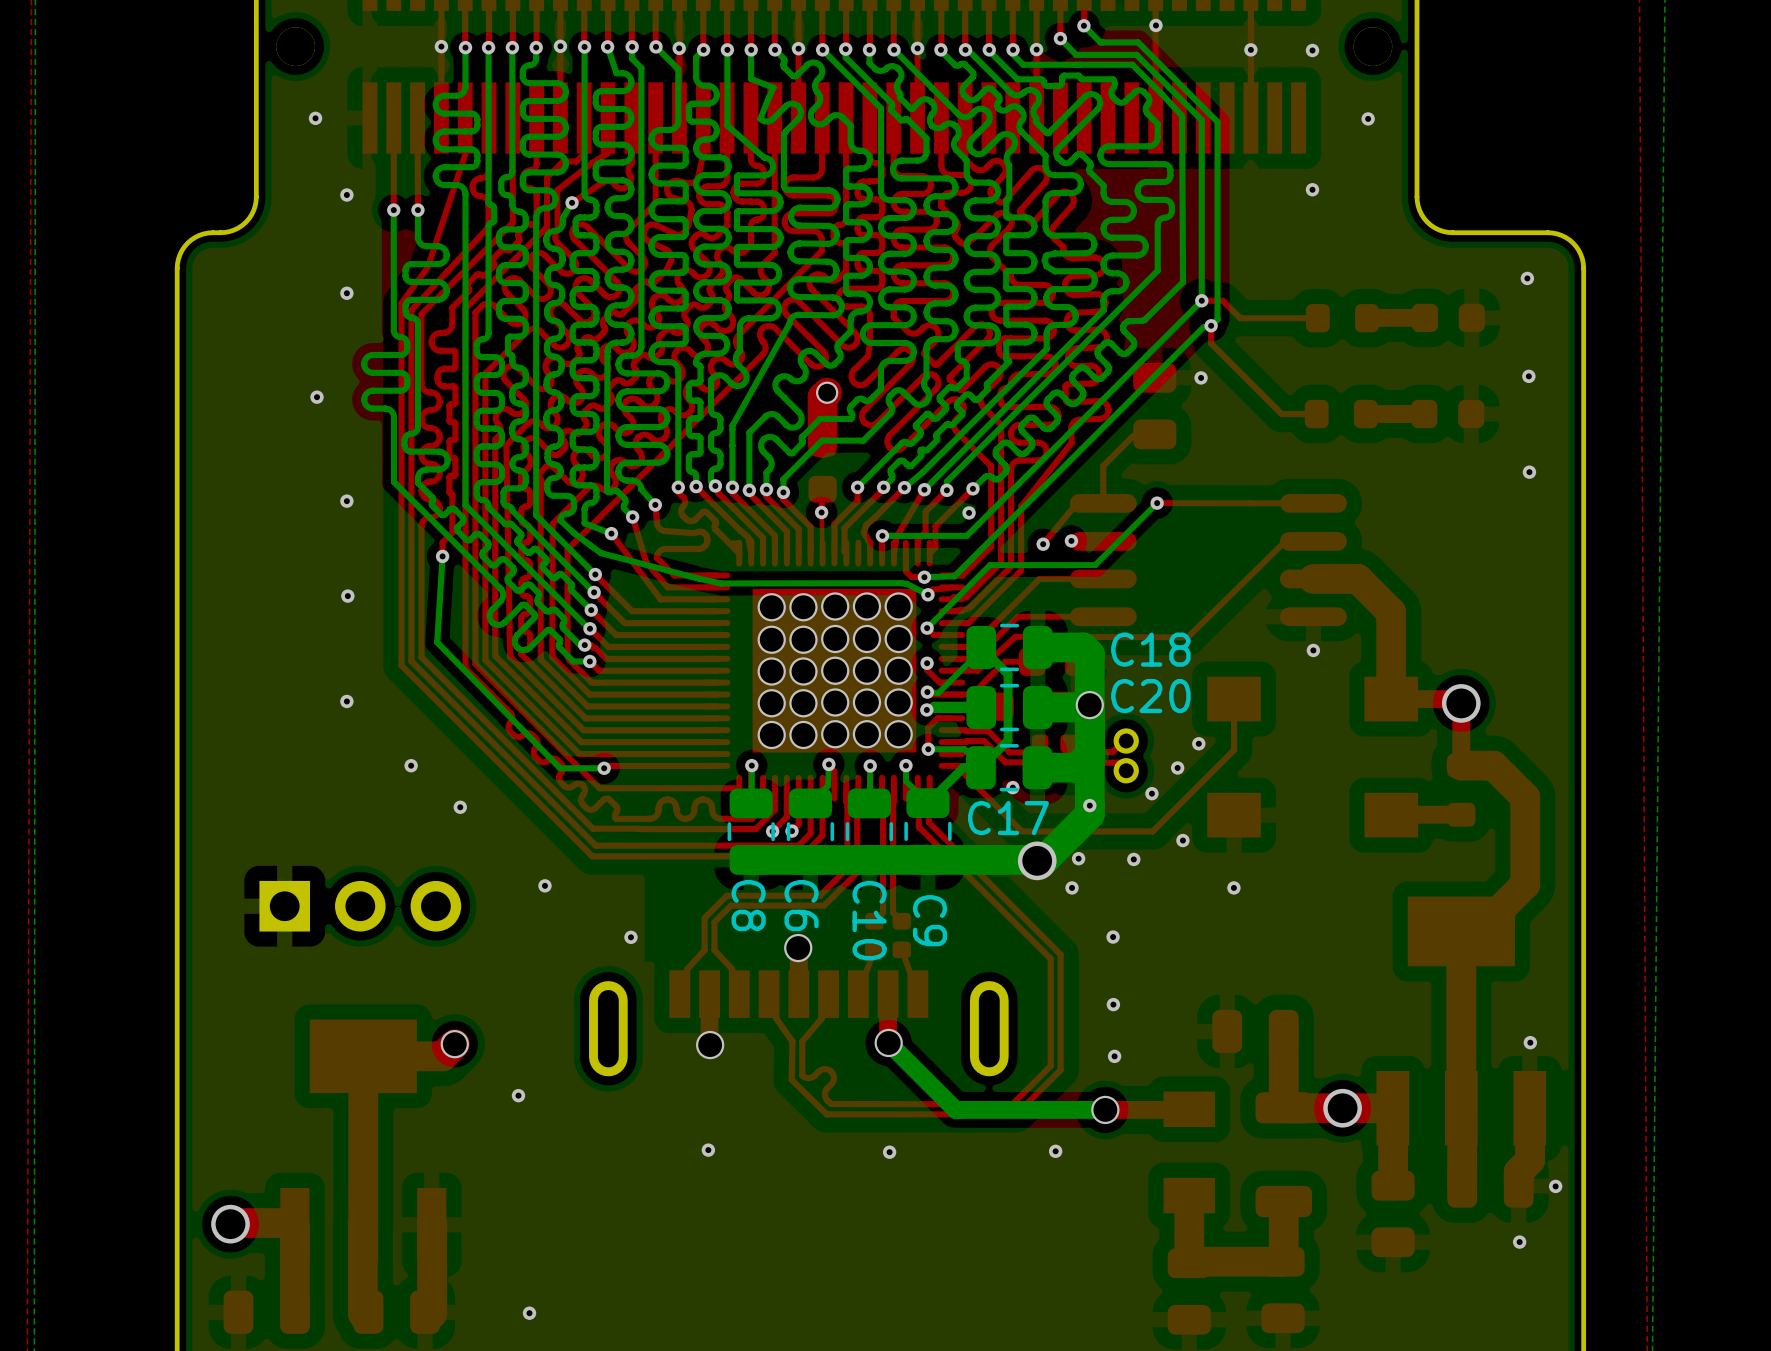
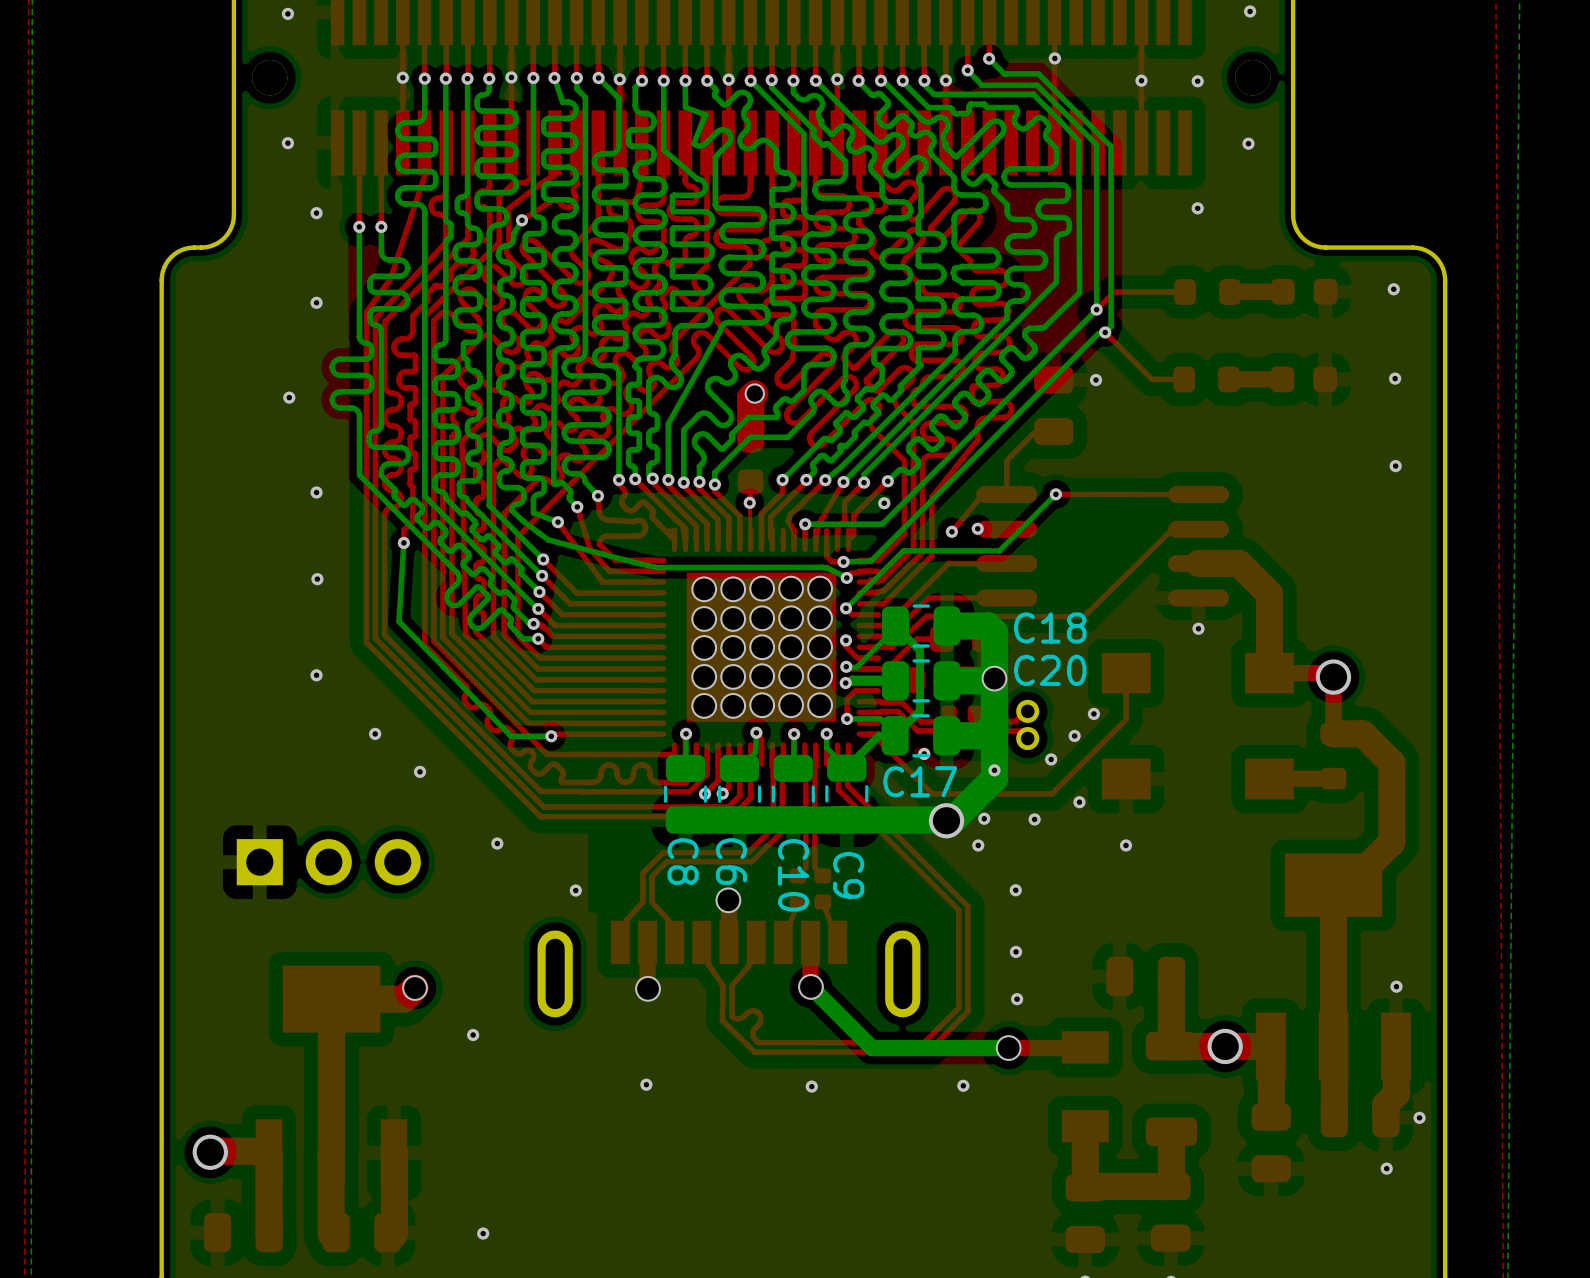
part: none -> (1207, 291)
part: none -> (1304, 291)
top track: (1201, 300) (1222, 300) (1240, 318) (1317, 318) -> (1096, 309) (1114, 291) (1185, 291)
top track: (1424, 317) (1367, 317) -> (1282, 291) (1230, 291)
part: (1448, 317) -> none
part: (1342, 318) -> none
top track: (1211, 325) (1211, 343) (1281, 414) (1316, 414) -> (1105, 332) (1152, 379) (1184, 379)
part: none -> (1206, 379)
part: none -> (1303, 379)
part: (1341, 414) -> none
top track: (1424, 414) (1365, 414) -> (1282, 379) (1228, 379)
part: (1447, 414) -> none

